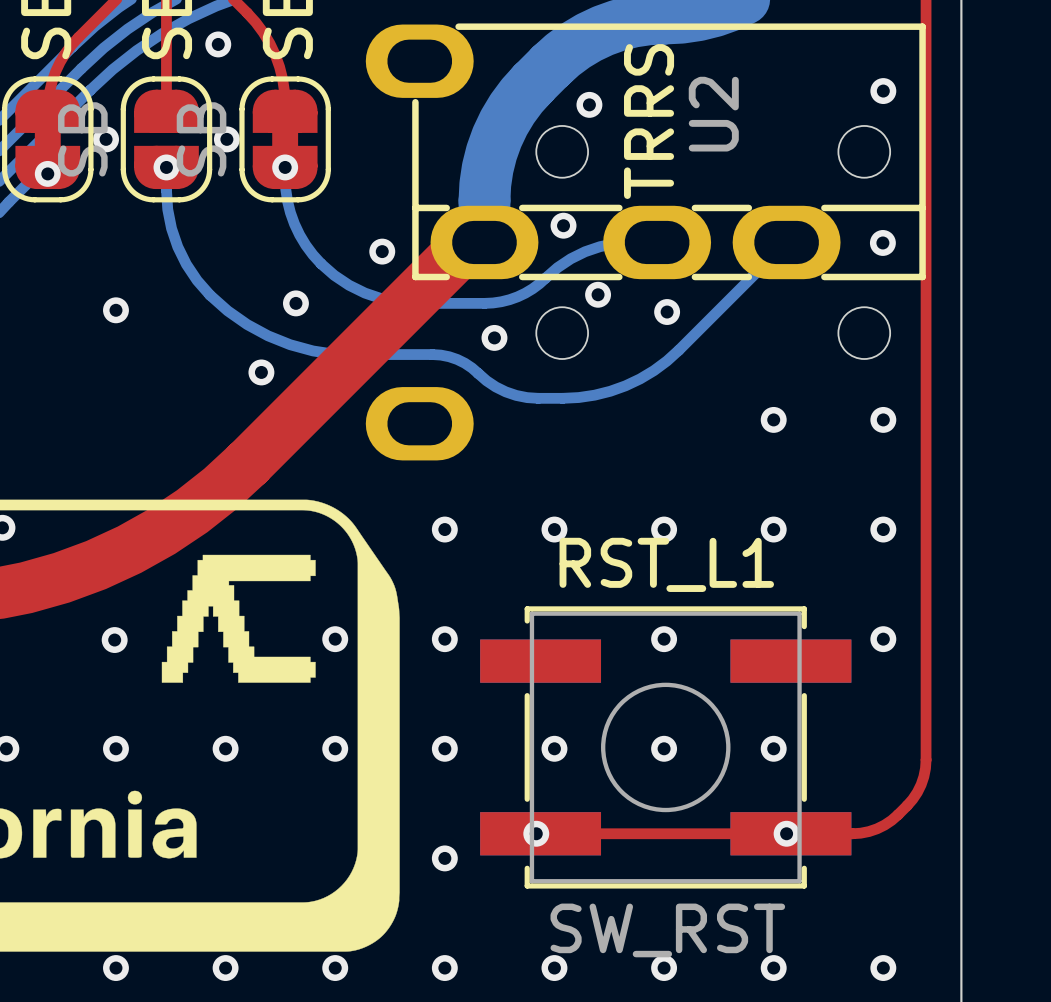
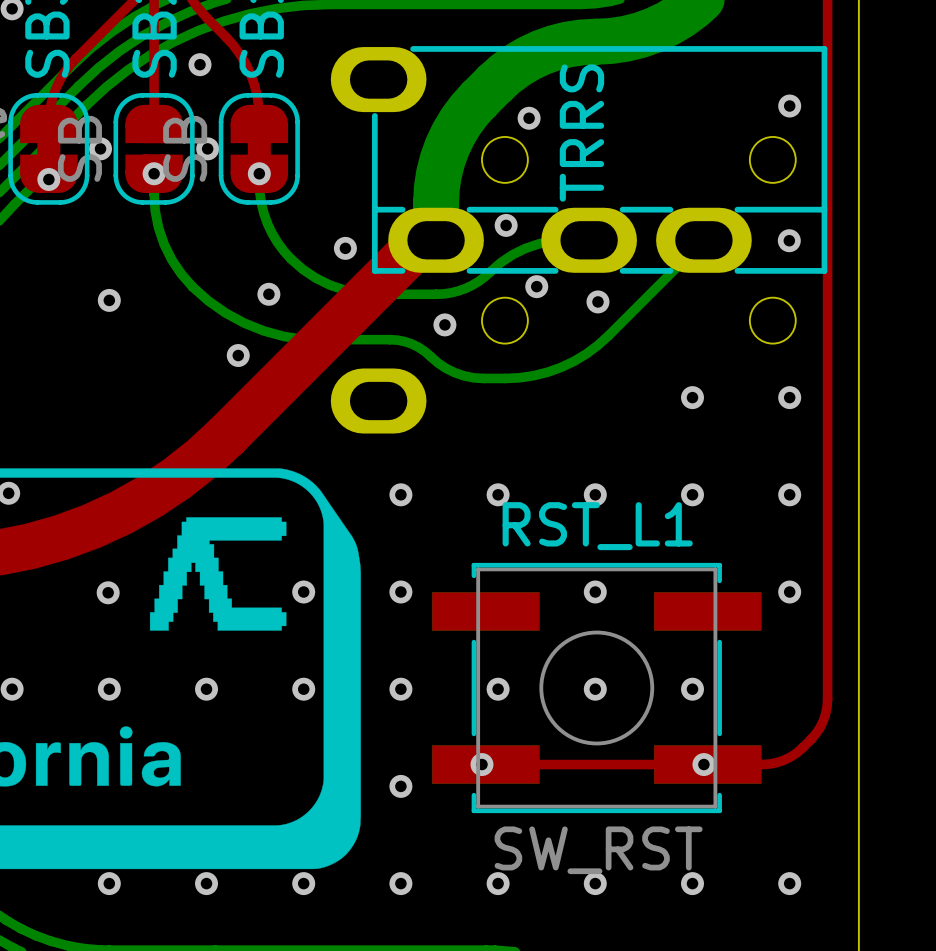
U2 name: U2 (713, 114) -> none

